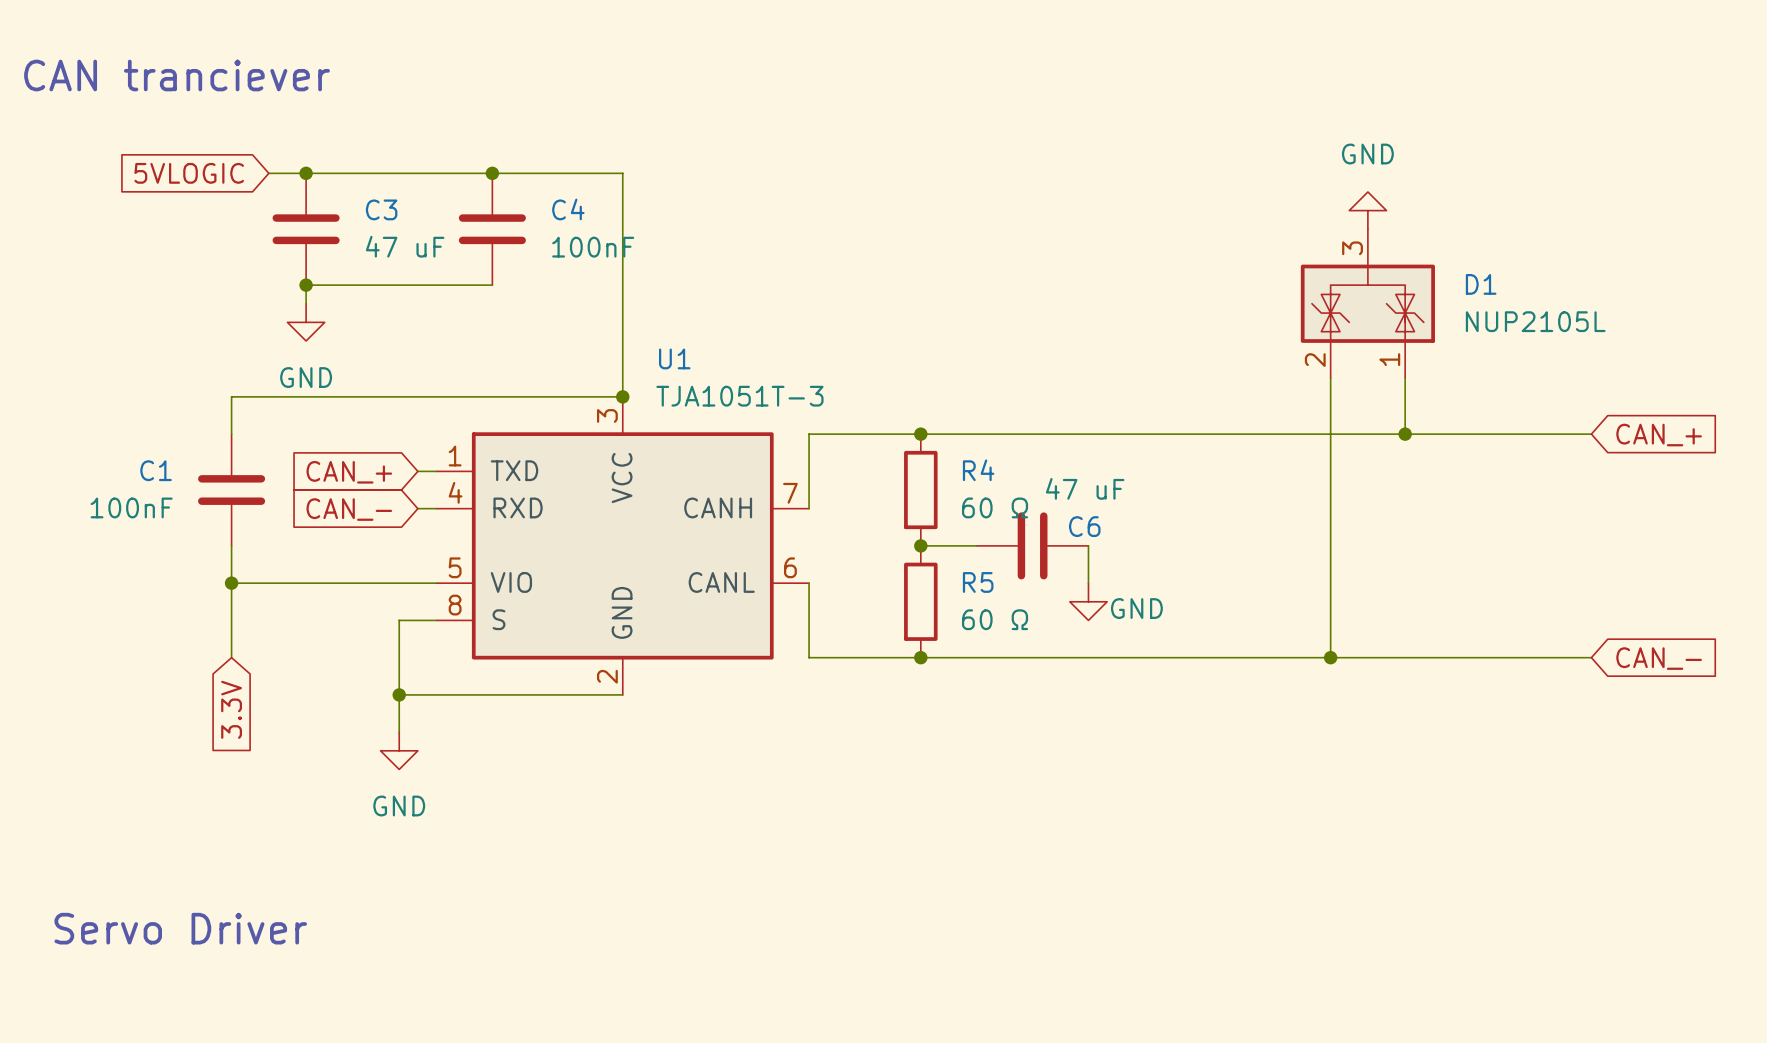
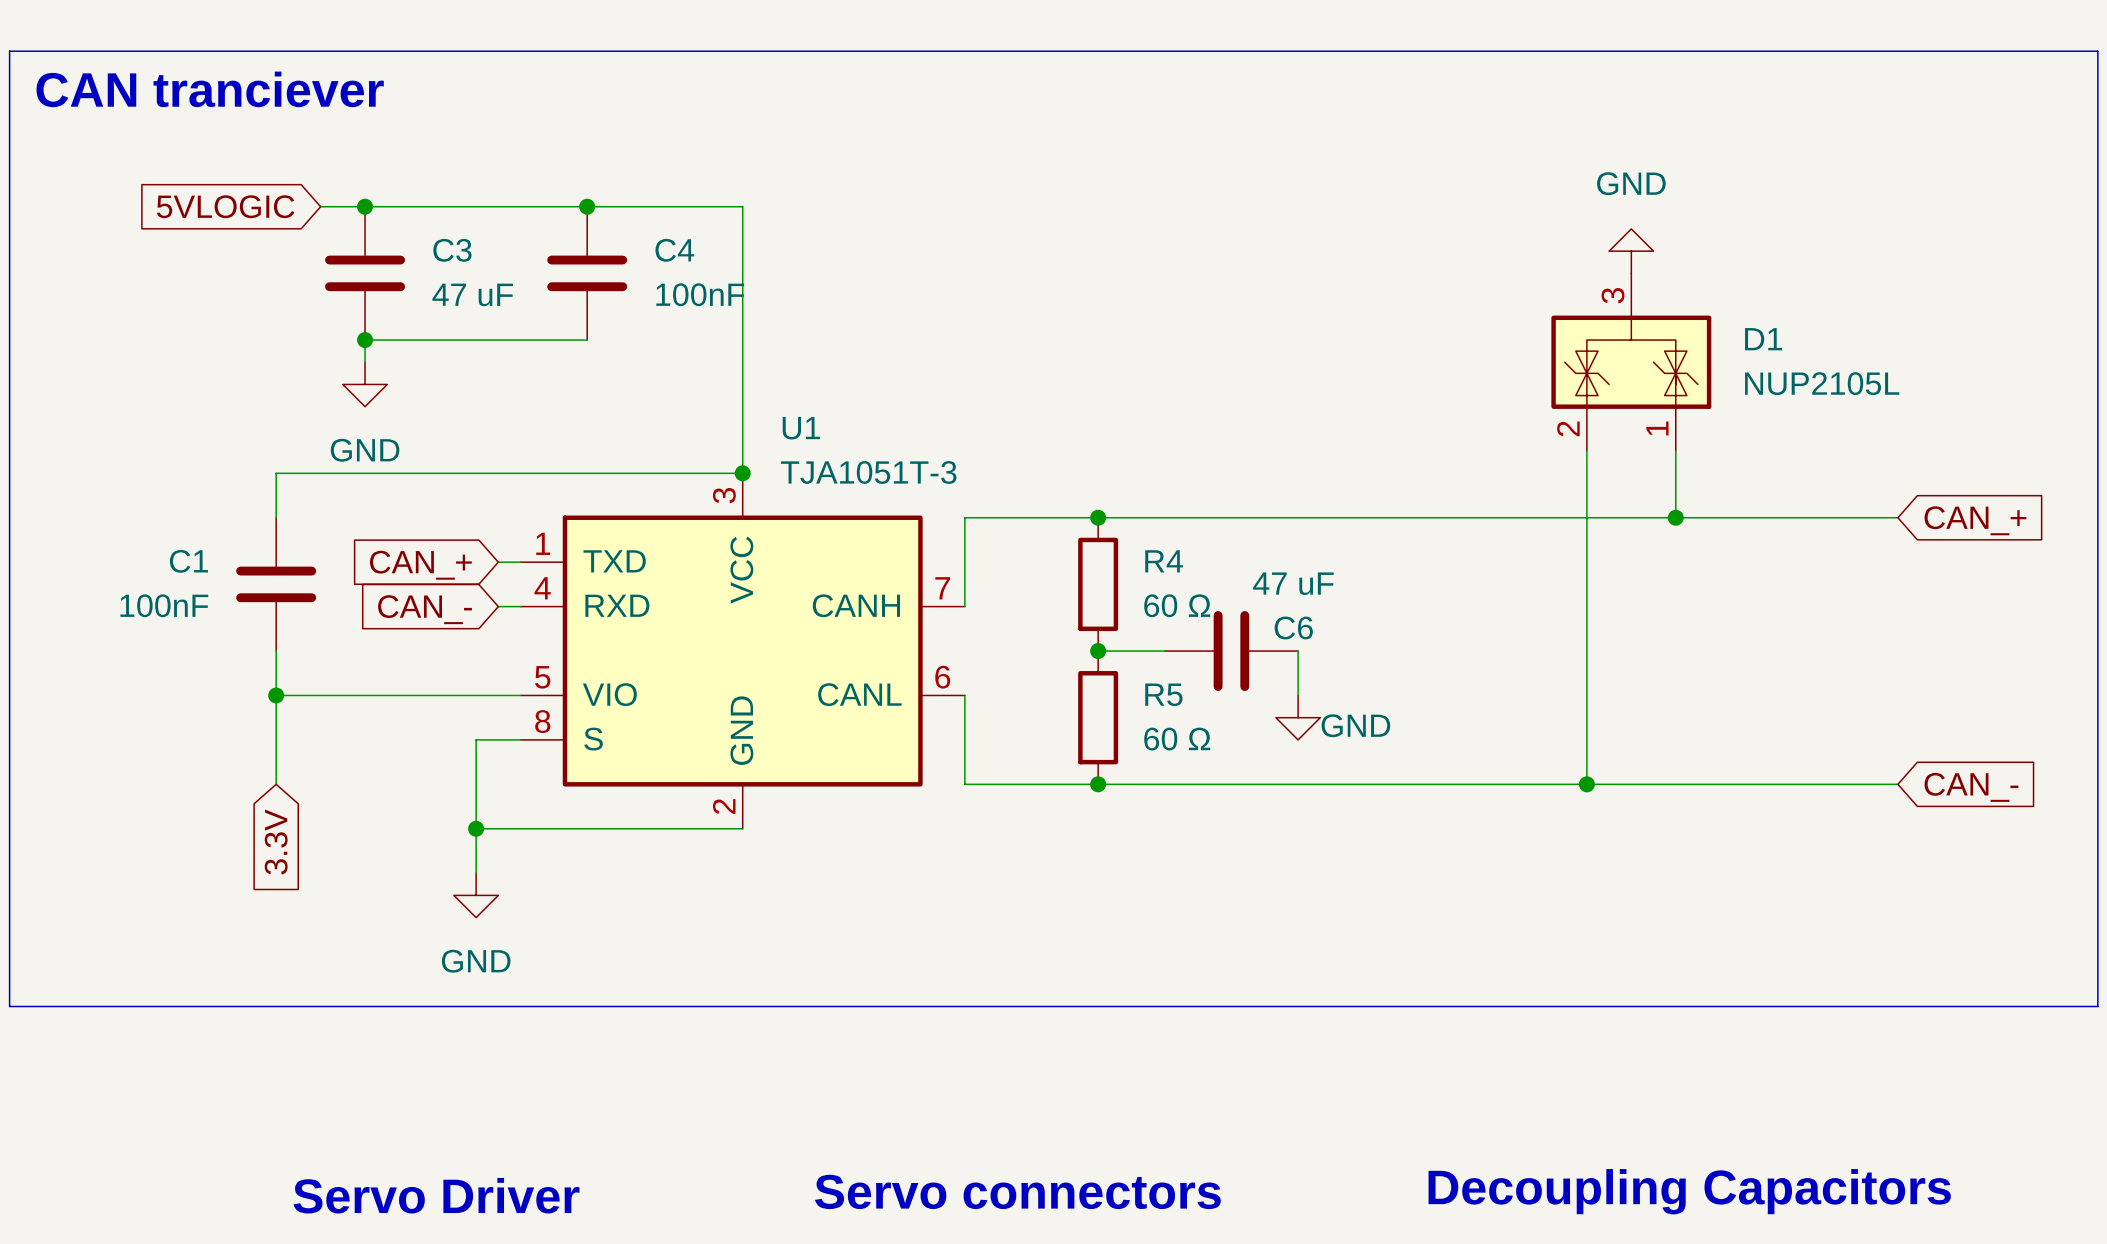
line: none -> (9, 51) (2097, 51) (2097, 1006) (9, 1006) (9, 51)
text position: Servo Driver (180, 928) -> Servo Driver (436, 1195)
text: none -> Servo connectors (1017, 1191)
text: none -> Decoupling Capacitors (1689, 1191)

